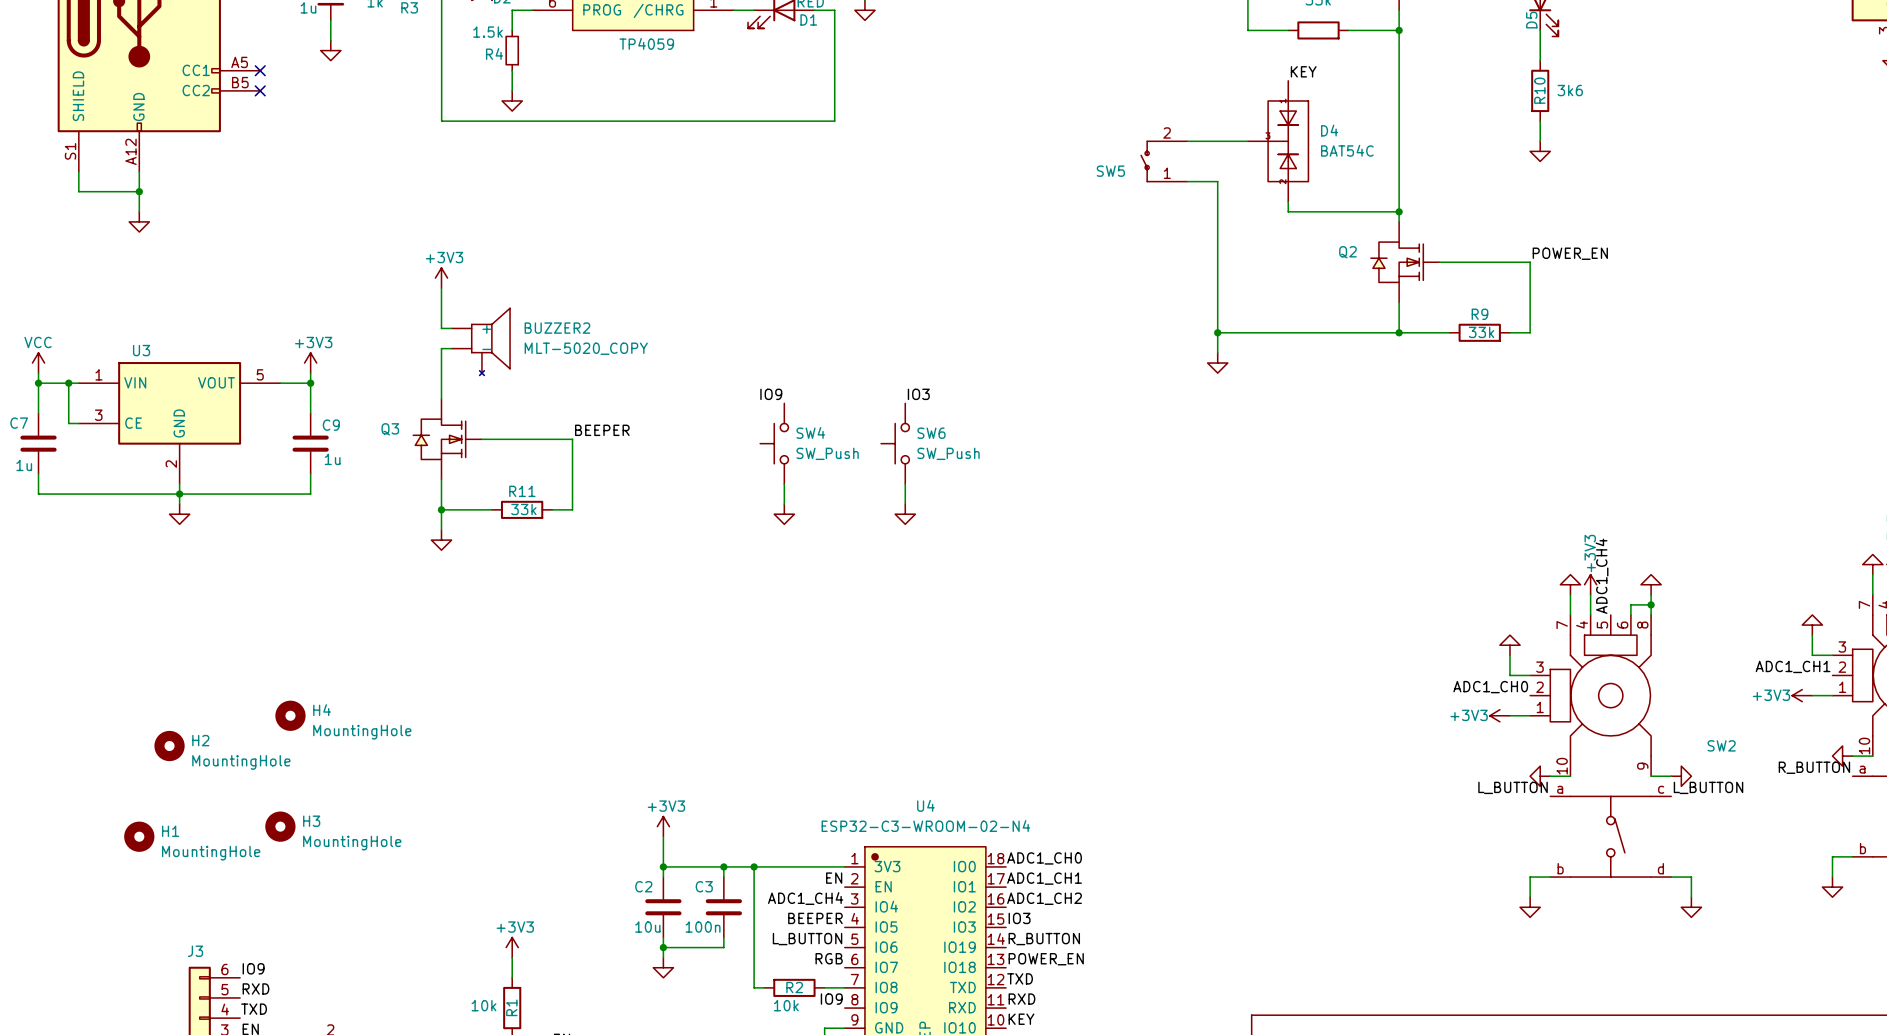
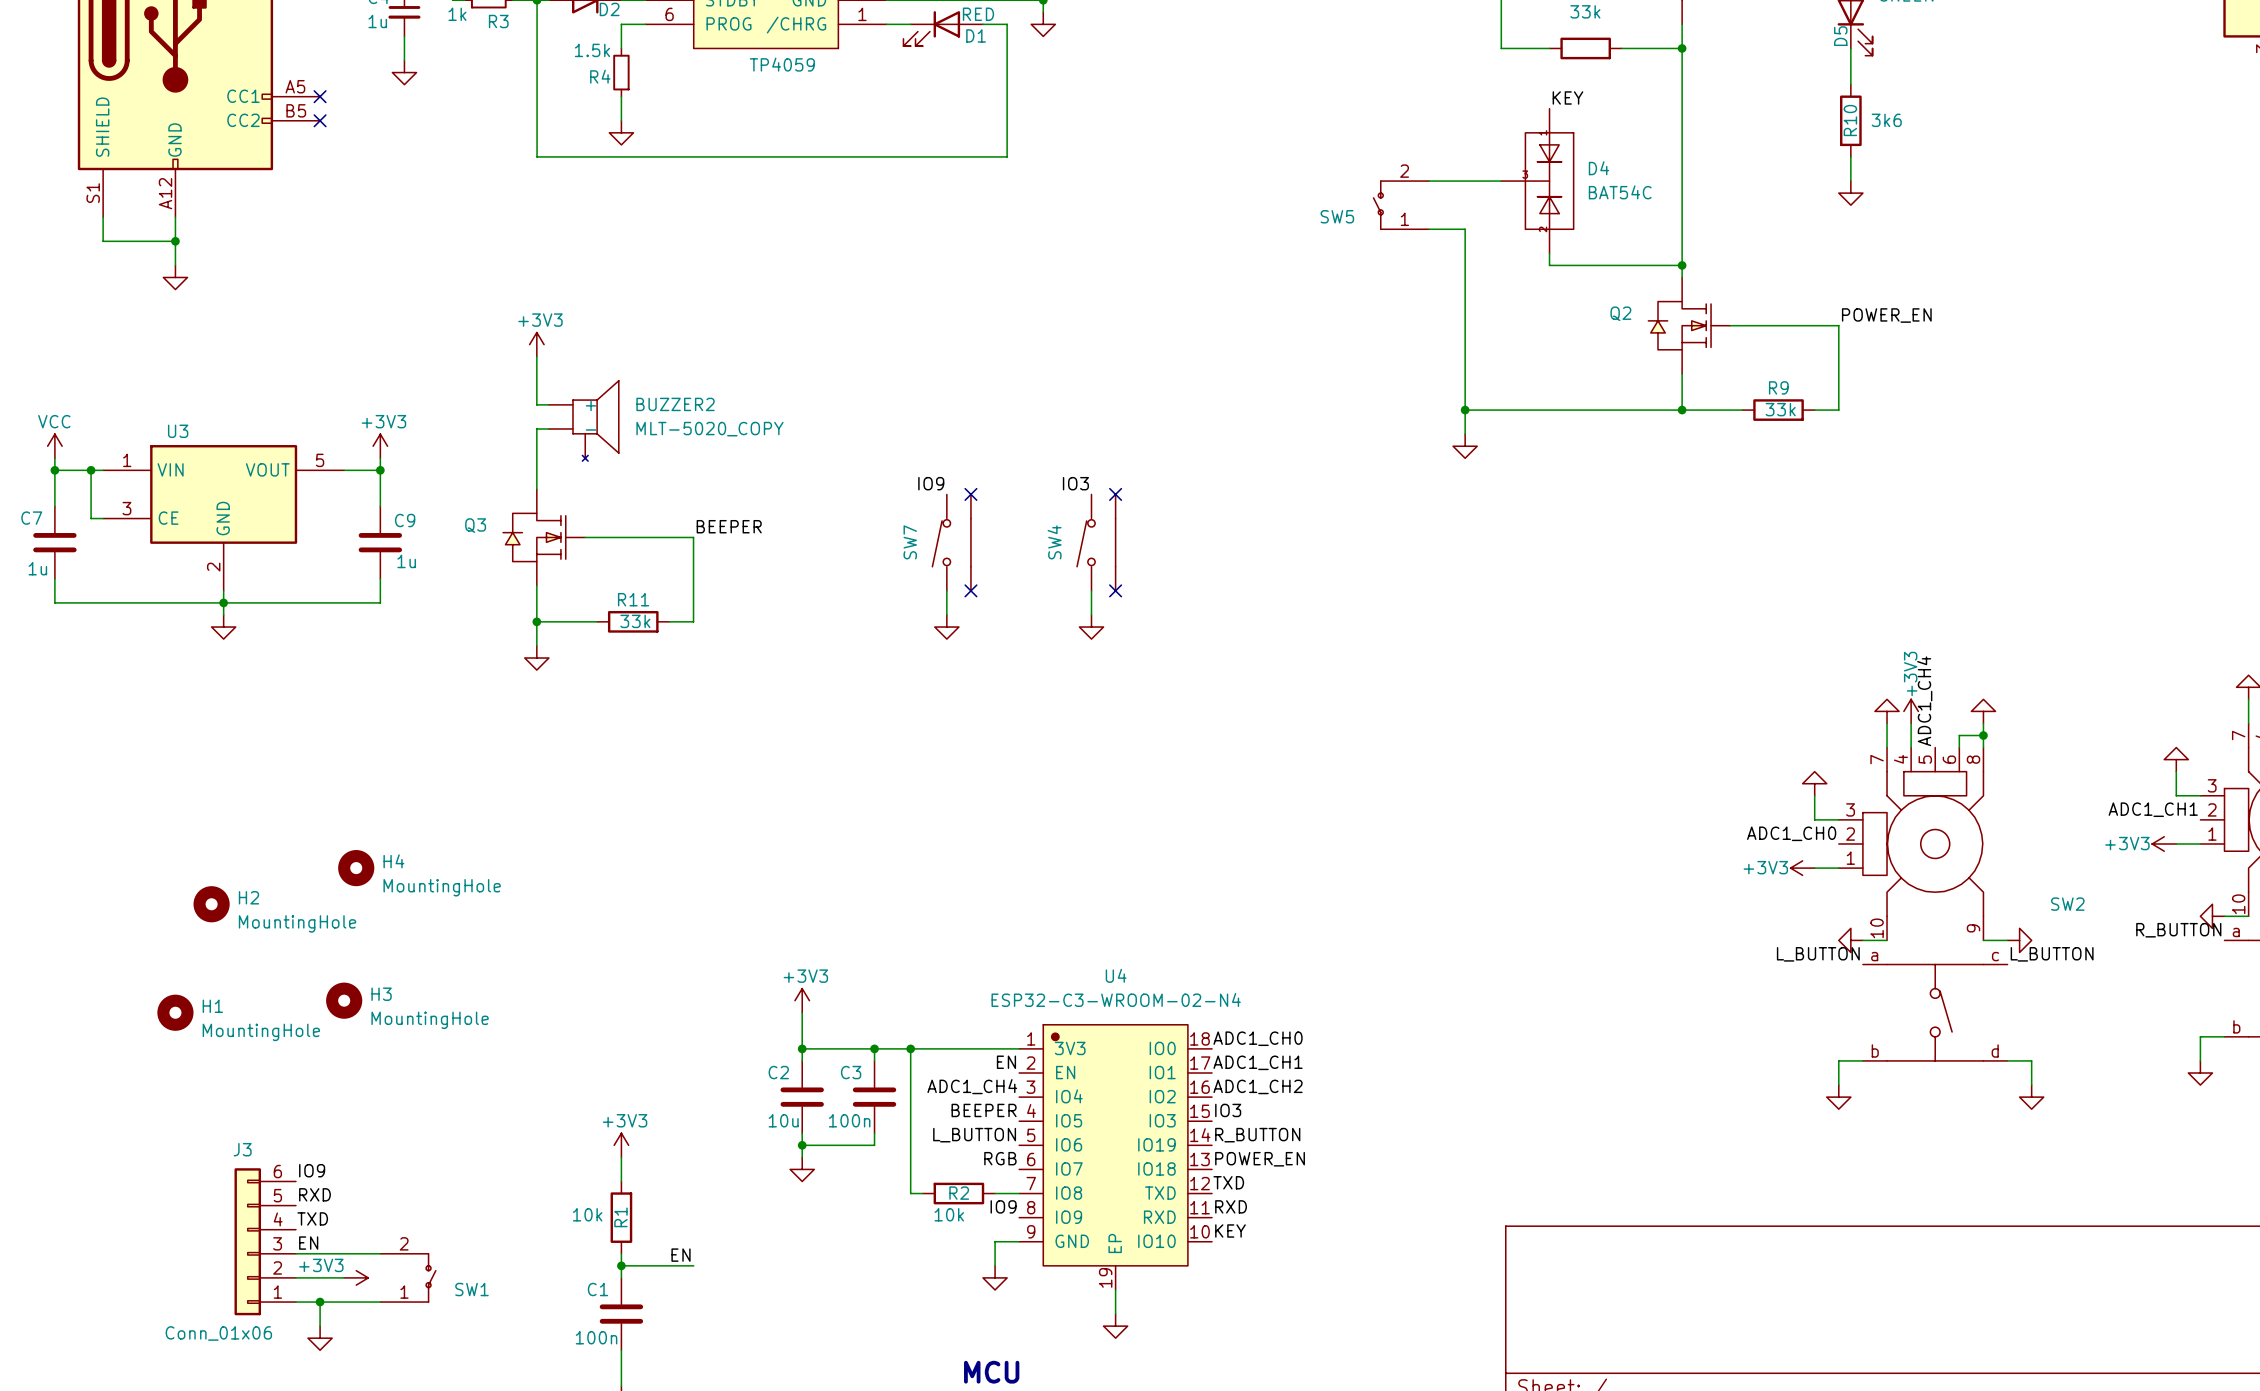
label position: IO3 (918, 394) -> IO3 (1075, 483)
SW4 symbol: [760, 403, 789, 484] -> [1076, 494, 1117, 591]
no-connect mark: none -> (970, 494)
no-connect mark: none -> (1115, 494)
SW4 name position: SW4 (810, 432) -> SW4 (1054, 542)
SW7: none -> (951, 542)
SW6: SW_Push (895, 443) -> none
SW4 value: SW_Push (827, 453) -> none
no-connect mark: none -> (970, 590)
no-connect mark: none -> (1115, 590)

